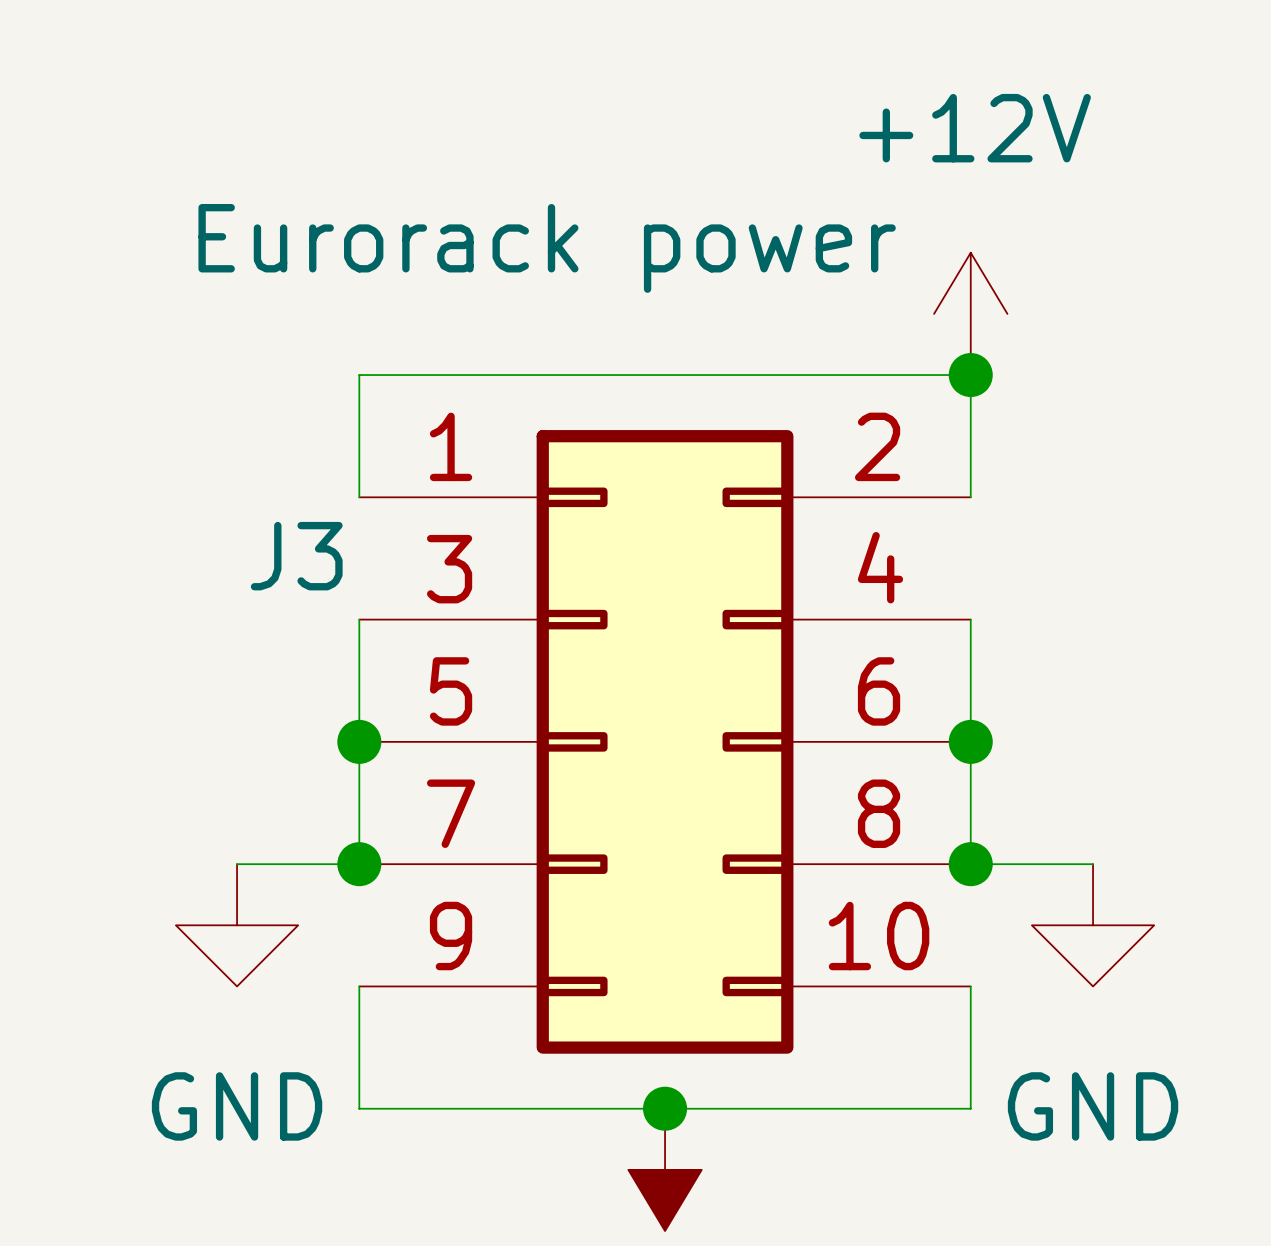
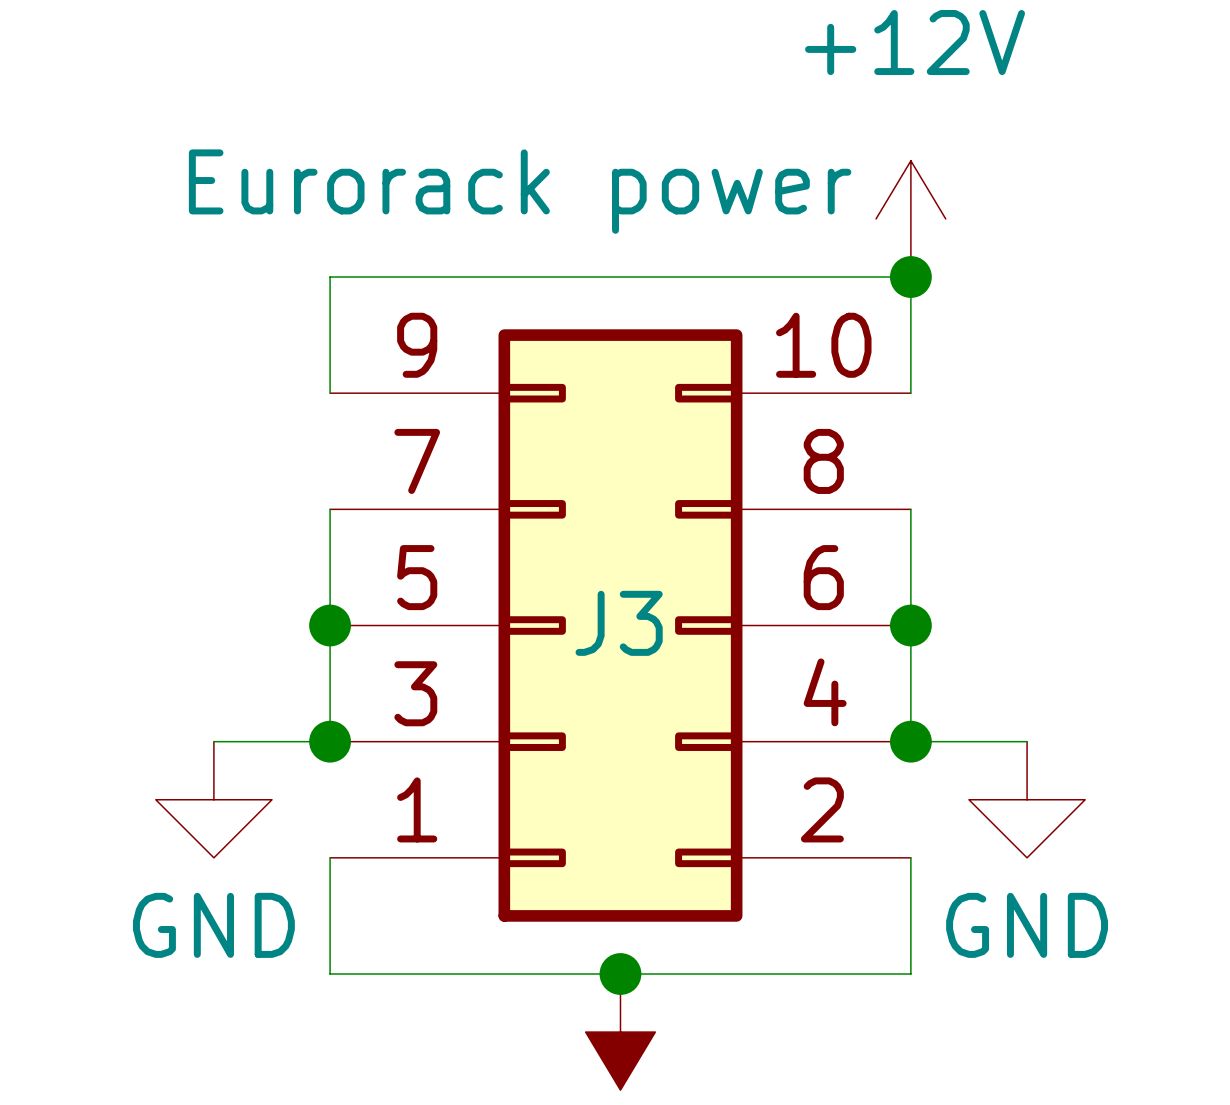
J3 name position: J3 (296, 556) -> J3 (619, 623)
J3 flip: as is (665, 741) -> up-down (620, 625)
power symbol text position: GND (237, 1106) -> GND (213, 925)
power symbol text position: GND (1093, 1106) -> GND (1027, 925)

